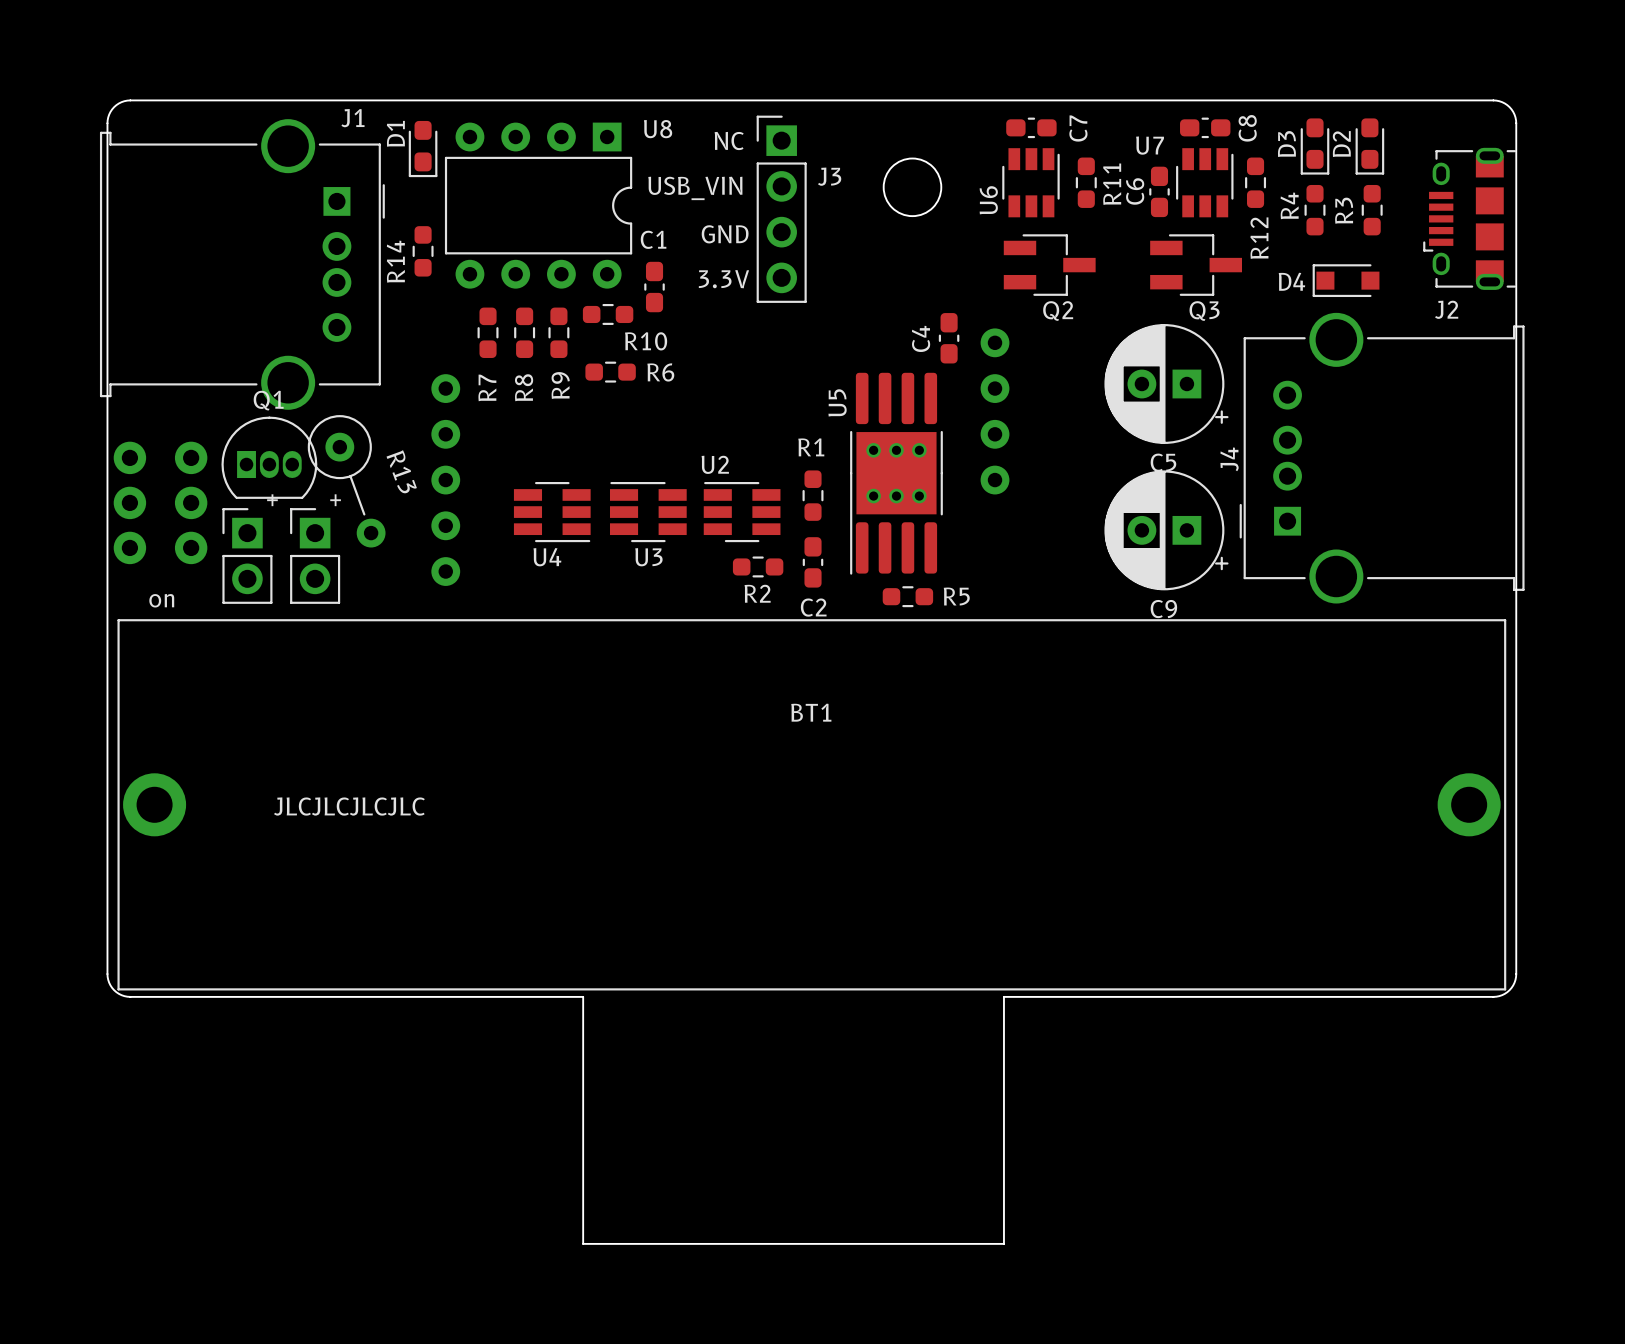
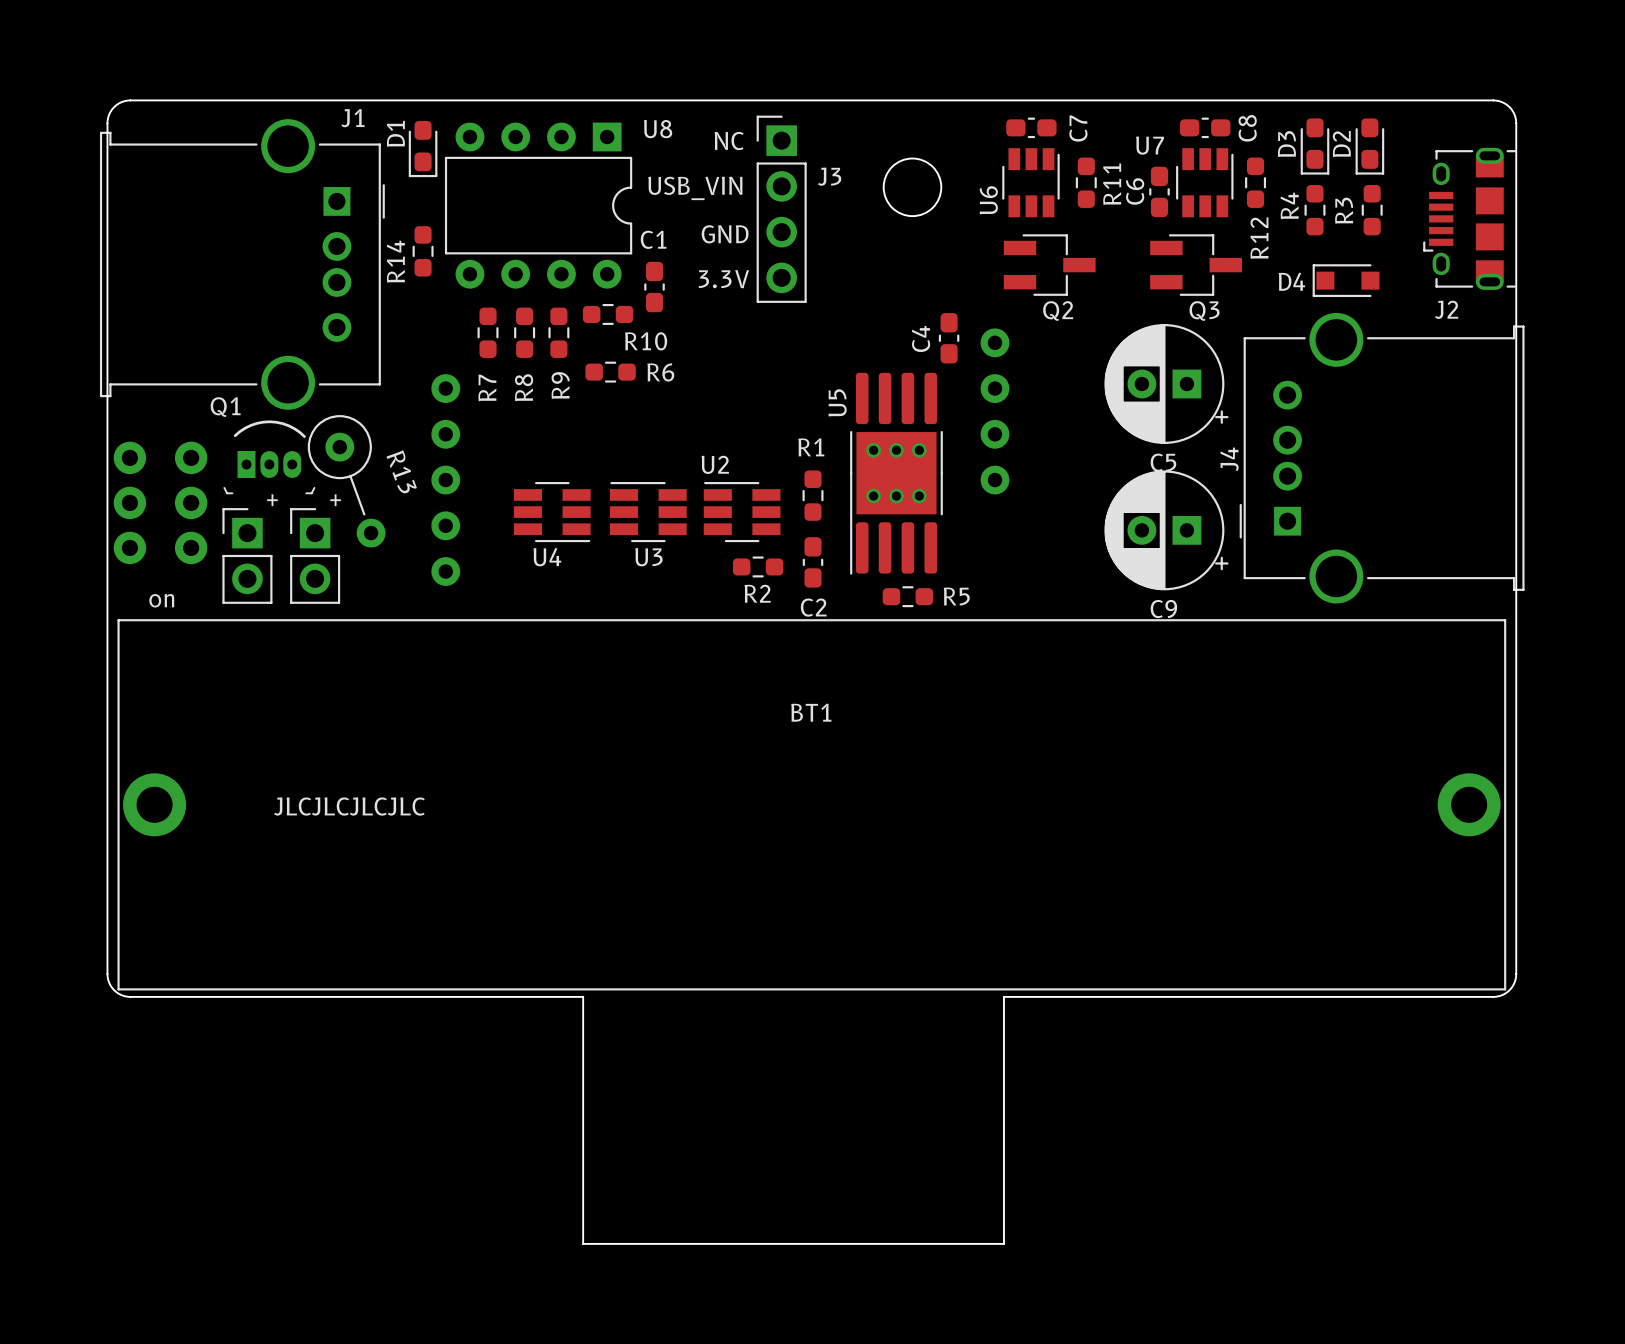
Q1 name position: Q1 (268, 400) -> Q1 (225, 407)
Q1 footprint: [221, 416, 318, 499] -> [223, 420, 316, 495]

